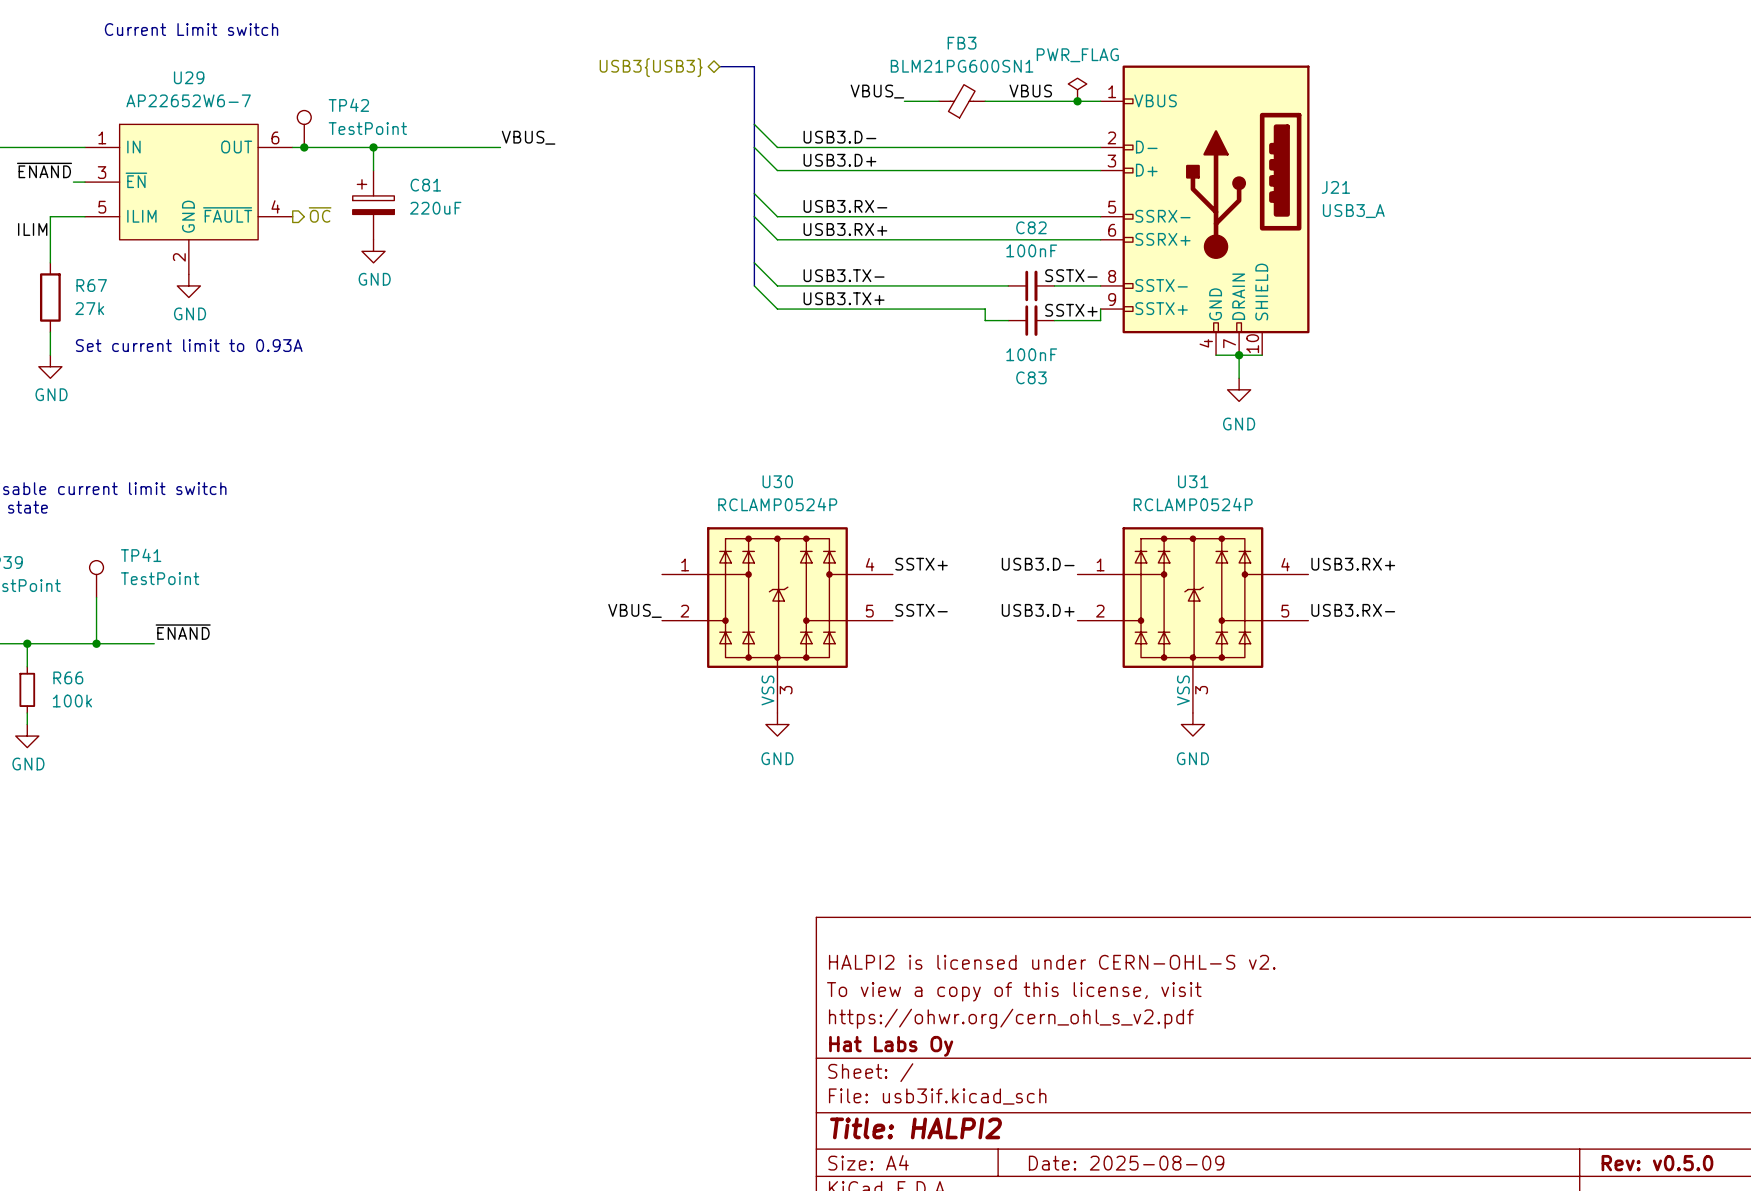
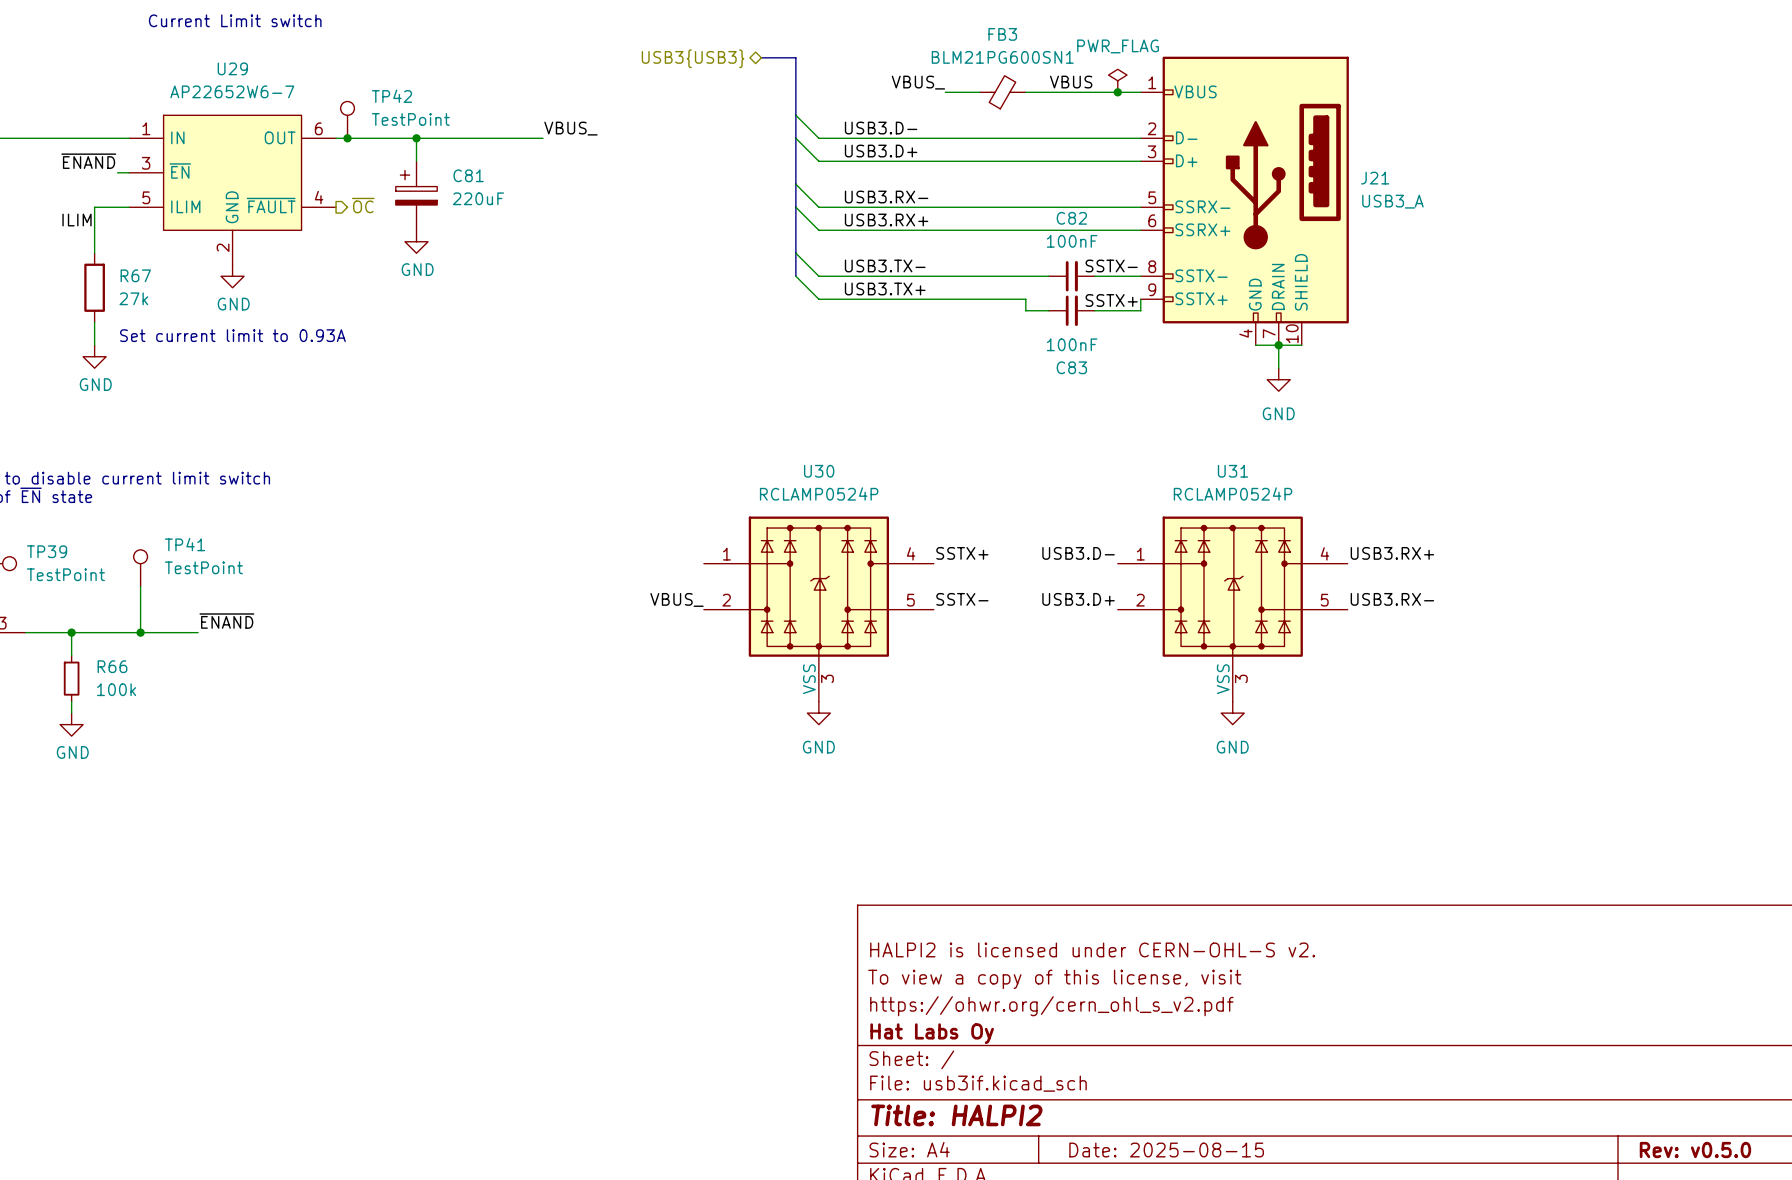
title block: Date: 2025-08-09 (1126, 1163) -> Date: 2025-08-15 (1166, 1150)

